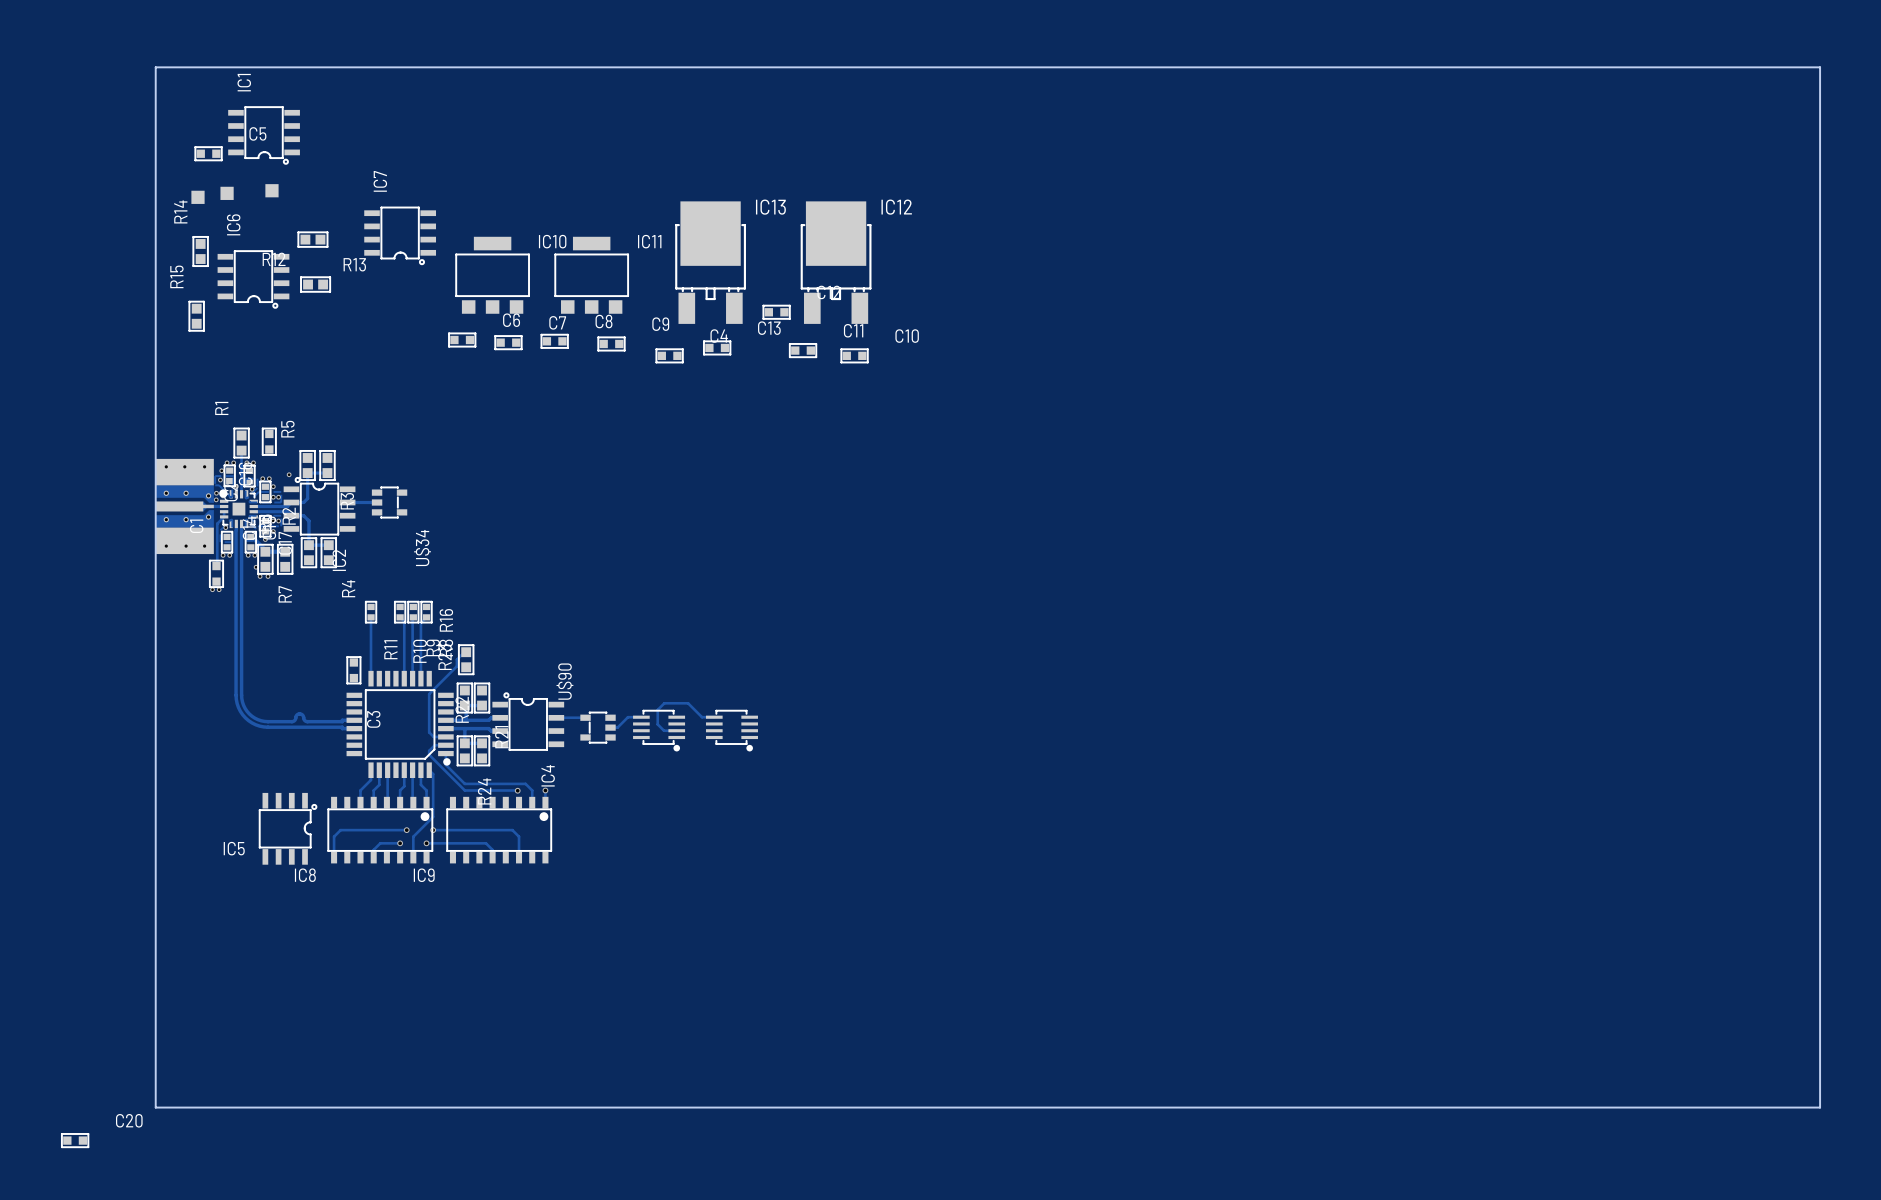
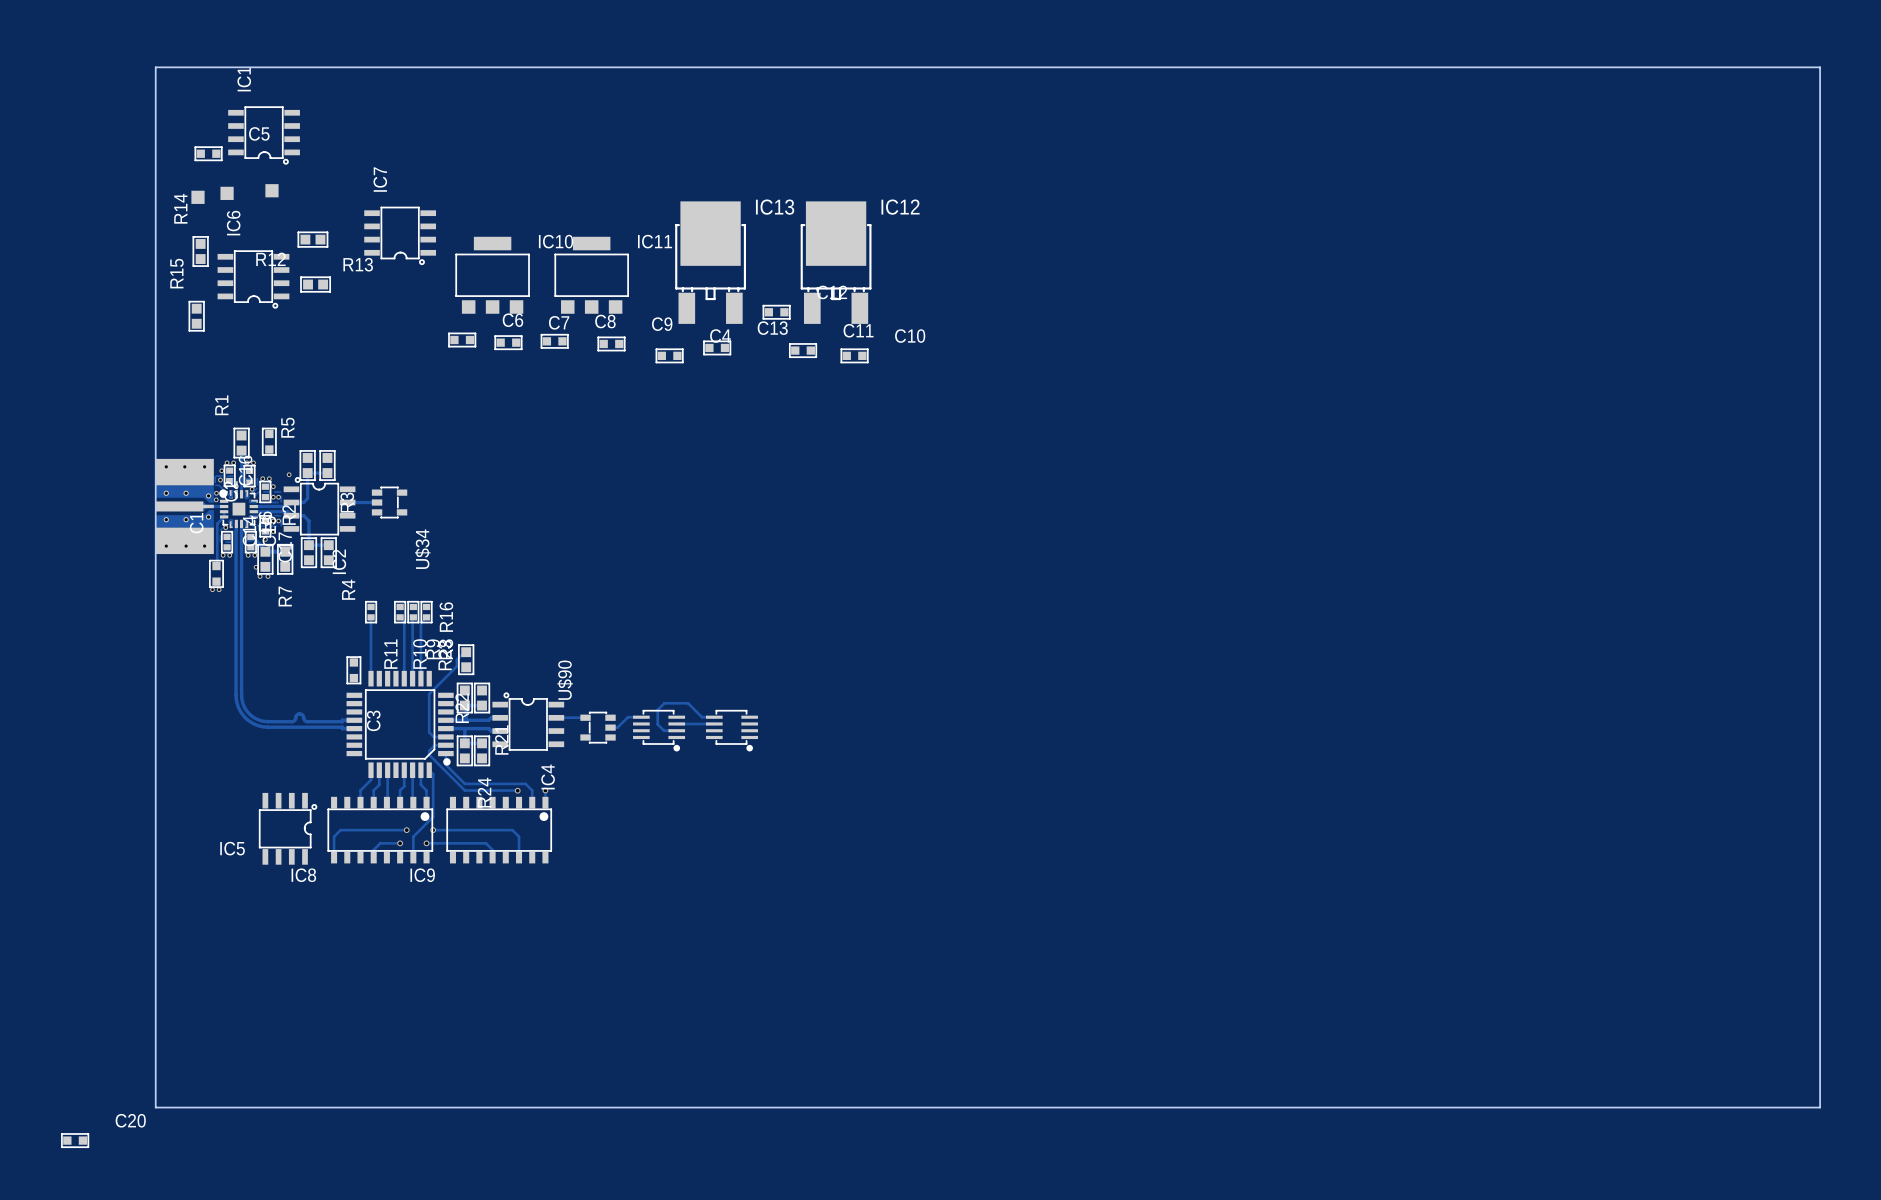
track: none -> (676, 723) (714, 723)

